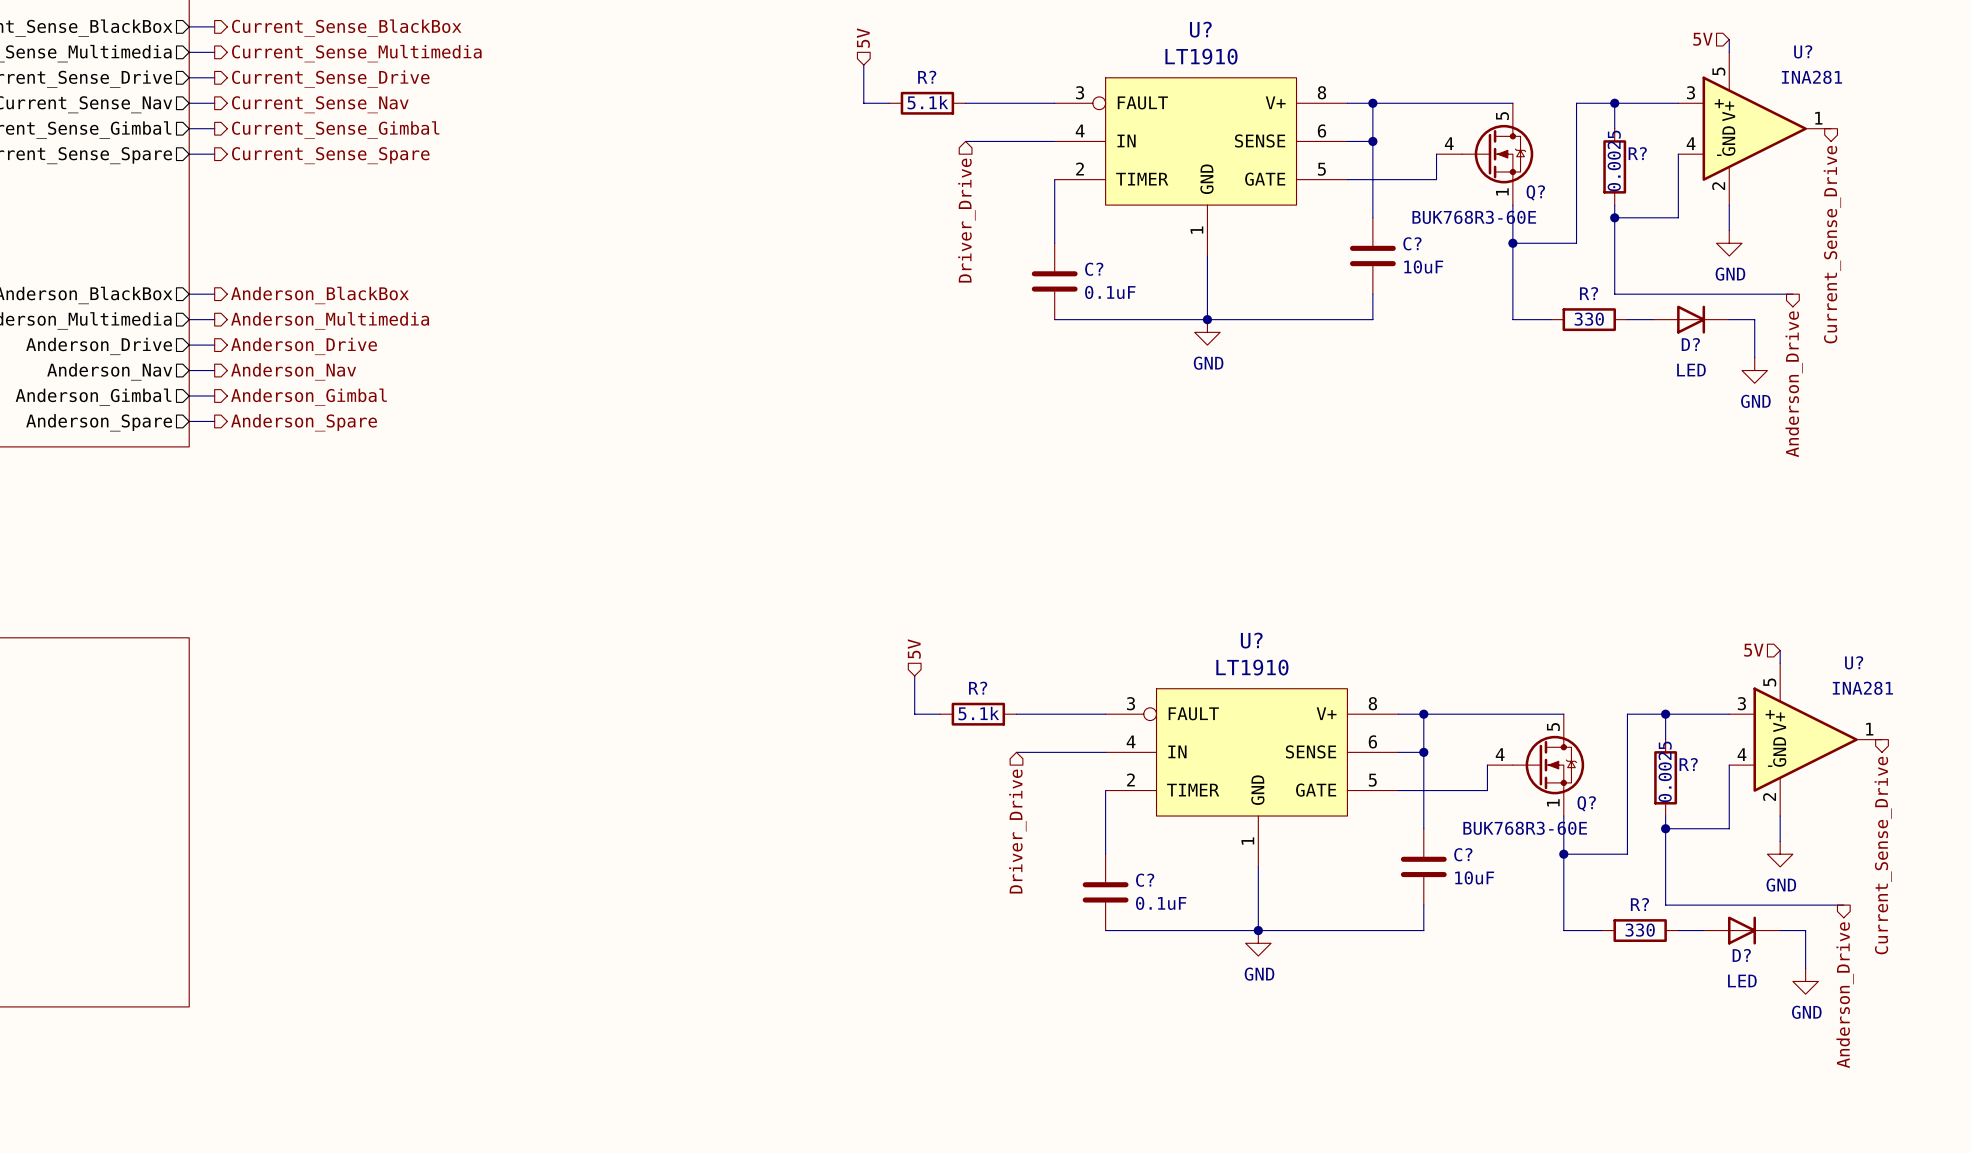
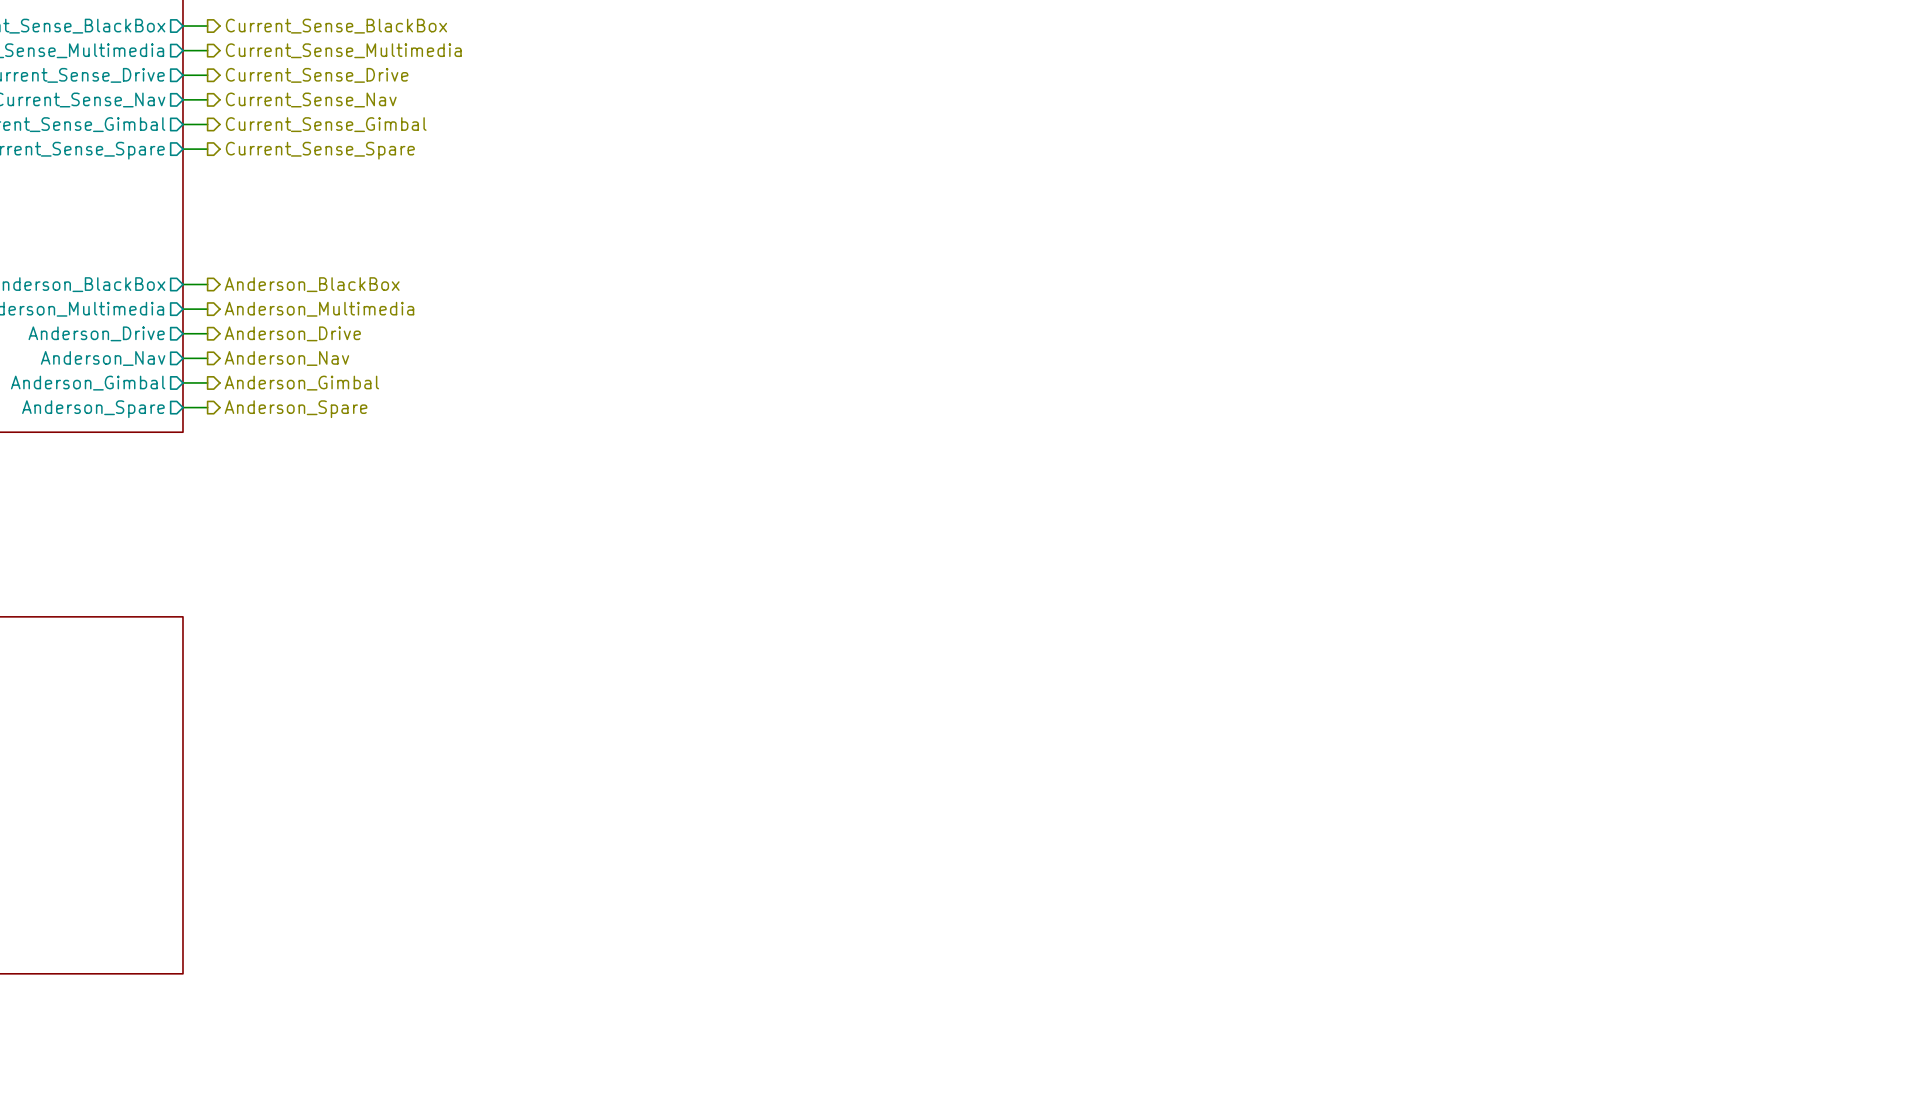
hierarchical label: 5V (863, 38) -> none
hierarchical label: 5V (1702, 39) -> none
wire: (1729, 39) (1729, 52) -> none
wire: (863, 65) (863, 103) (889, 103) -> none
R?: 5.1k (927, 103) -> none
wire: (965, 103) (1054, 103) -> none
wire: (1347, 103) (1512, 103) -> none
wire: (1372, 103) (1372, 217) -> none
junction: (1372, 103) -> none
wire: (1614, 103) (1614, 128) -> none
junction: (1614, 103) -> none
wire: (1678, 103) (1576, 103) (1576, 243) (1512, 243) -> none
U?: INA281 (1754, 128) -> none
wire: (965, 141) (1054, 141) -> none
wire: (1347, 141) (1372, 141) -> none
junction: (1372, 141) -> none
wire: (1436, 154) (1436, 179) (1347, 179) -> none
Q?: BUK768R3-60E (1484, 154) -> none
wire: (1678, 154) (1678, 217) (1614, 217) -> none
U?: LT1910 (1201, 166) -> none
R?: 0.0025 (1614, 166) -> none
wire: (1054, 179) (1054, 243) -> none
wire: (1512, 205) (1512, 319) (1551, 319) -> none
wire: (1614, 205) (1614, 294) (1792, 294) -> none
wire: (1729, 205) (1729, 230) -> none
junction: (1614, 217) -> none
hierarchical label: Driver_Drive (966, 220) -> none
junction: (1512, 243) -> none
power symbol: GND (1729, 243) -> none
hierarchical label: Current_Sense_Drive (1832, 244) -> none
wire: (1207, 255) (1207, 319) -> none
C?: 10uF (1372, 255) -> none
C?: 0.1uF (1054, 281) -> none
wire: (1372, 294) (1372, 319) (1054, 319) -> none
junction: (1207, 319) -> none
R?: 330 (1589, 319) -> none
wire: (1627, 319) (1652, 319) -> none
D?: LED (1691, 319) -> none
wire: (1729, 319) (1754, 319) (1754, 357) -> none
power symbol: GND (1207, 332) -> none
power symbol: GND (1754, 370) -> none
hierarchical label: Anderson_Drive (1794, 384) -> none
hierarchical label: 5V (914, 648) -> none
hierarchical label: 5V (1753, 650) -> none
wire: (1780, 650) (1780, 663) -> none
wire: (914, 676) (914, 714) (940, 714) -> none
R?: 5.1k (978, 714) -> none
wire: (1016, 714) (1105, 714) -> none
wire: (1398, 714) (1563, 714) -> none
wire: (1423, 714) (1423, 828) -> none
junction: (1423, 714) -> none
wire: (1665, 714) (1665, 739) -> none
junction: (1665, 714) -> none
wire: (1729, 714) (1627, 714) (1627, 854) (1563, 854) -> none
U?: INA281 (1805, 739) -> none
wire: (1016, 752) (1105, 752) -> none
wire: (1398, 752) (1423, 752) -> none
junction: (1423, 752) -> none
wire: (1487, 765) (1487, 790) (1398, 790) -> none
Q?: BUK768R3-60E (1535, 765) -> none
wire: (1729, 765) (1729, 828) (1665, 828) -> none
U?: LT1910 (1251, 777) -> none
R?: 0.0025 (1665, 777) -> none
wire: (1105, 790) (1105, 854) -> none
wire: (1563, 816) (1563, 930) (1601, 930) -> none
wire: (1665, 816) (1665, 905) (1843, 905) -> none
wire: (1780, 816) (1780, 841) -> none
junction: (1665, 828) -> none
hierarchical label: Driver_Drive (1017, 831) -> none
junction: (1563, 854) -> none
power symbol: GND (1780, 854) -> none
hierarchical label: Current_Sense_Drive (1883, 855) -> none
wire: (1258, 866) (1258, 930) -> none
C?: 10uF (1423, 866) -> none
C?: 0.1uF (1105, 892) -> none
wire: (1423, 905) (1423, 930) (1105, 930) -> none
junction: (1258, 930) -> none
R?: 330 (1640, 930) -> none
wire: (1678, 930) (1703, 930) -> none
D?: LED (1741, 930) -> none
wire: (1780, 930) (1805, 930) (1805, 968) -> none
power symbol: GND (1258, 943) -> none
power symbol: GND (1805, 981) -> none
hierarchical label: Anderson_Drive (1845, 995) -> none

